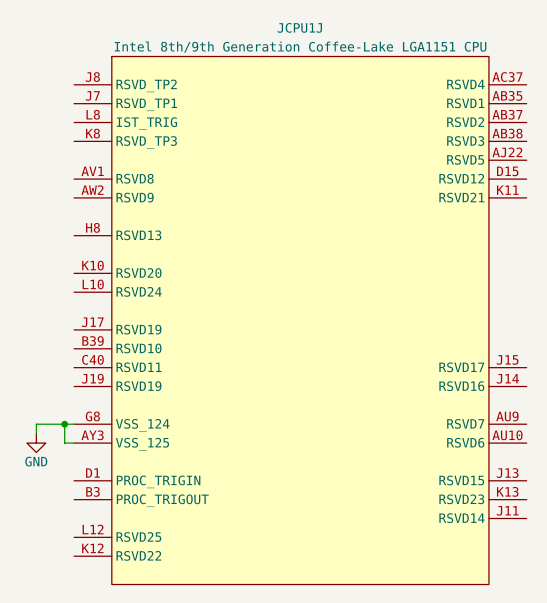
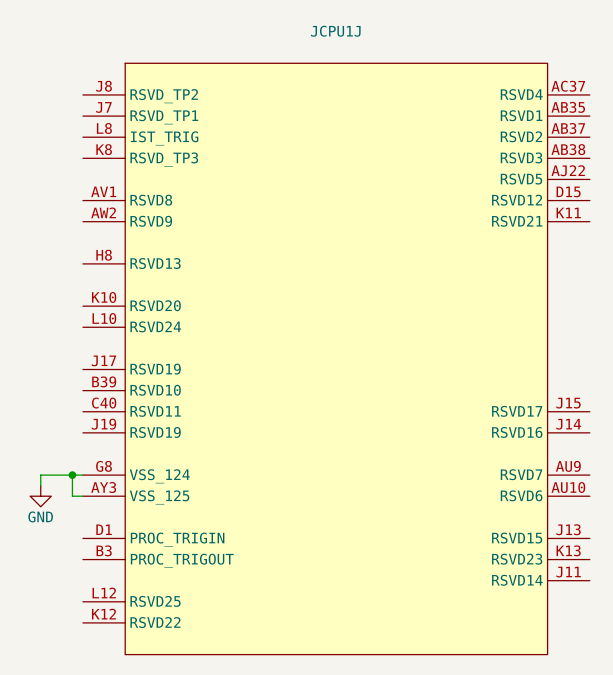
JCPU1J value: Intel 8th/9th Generation Coffee-Lake LGA1151 CPU (300, 47) -> none

